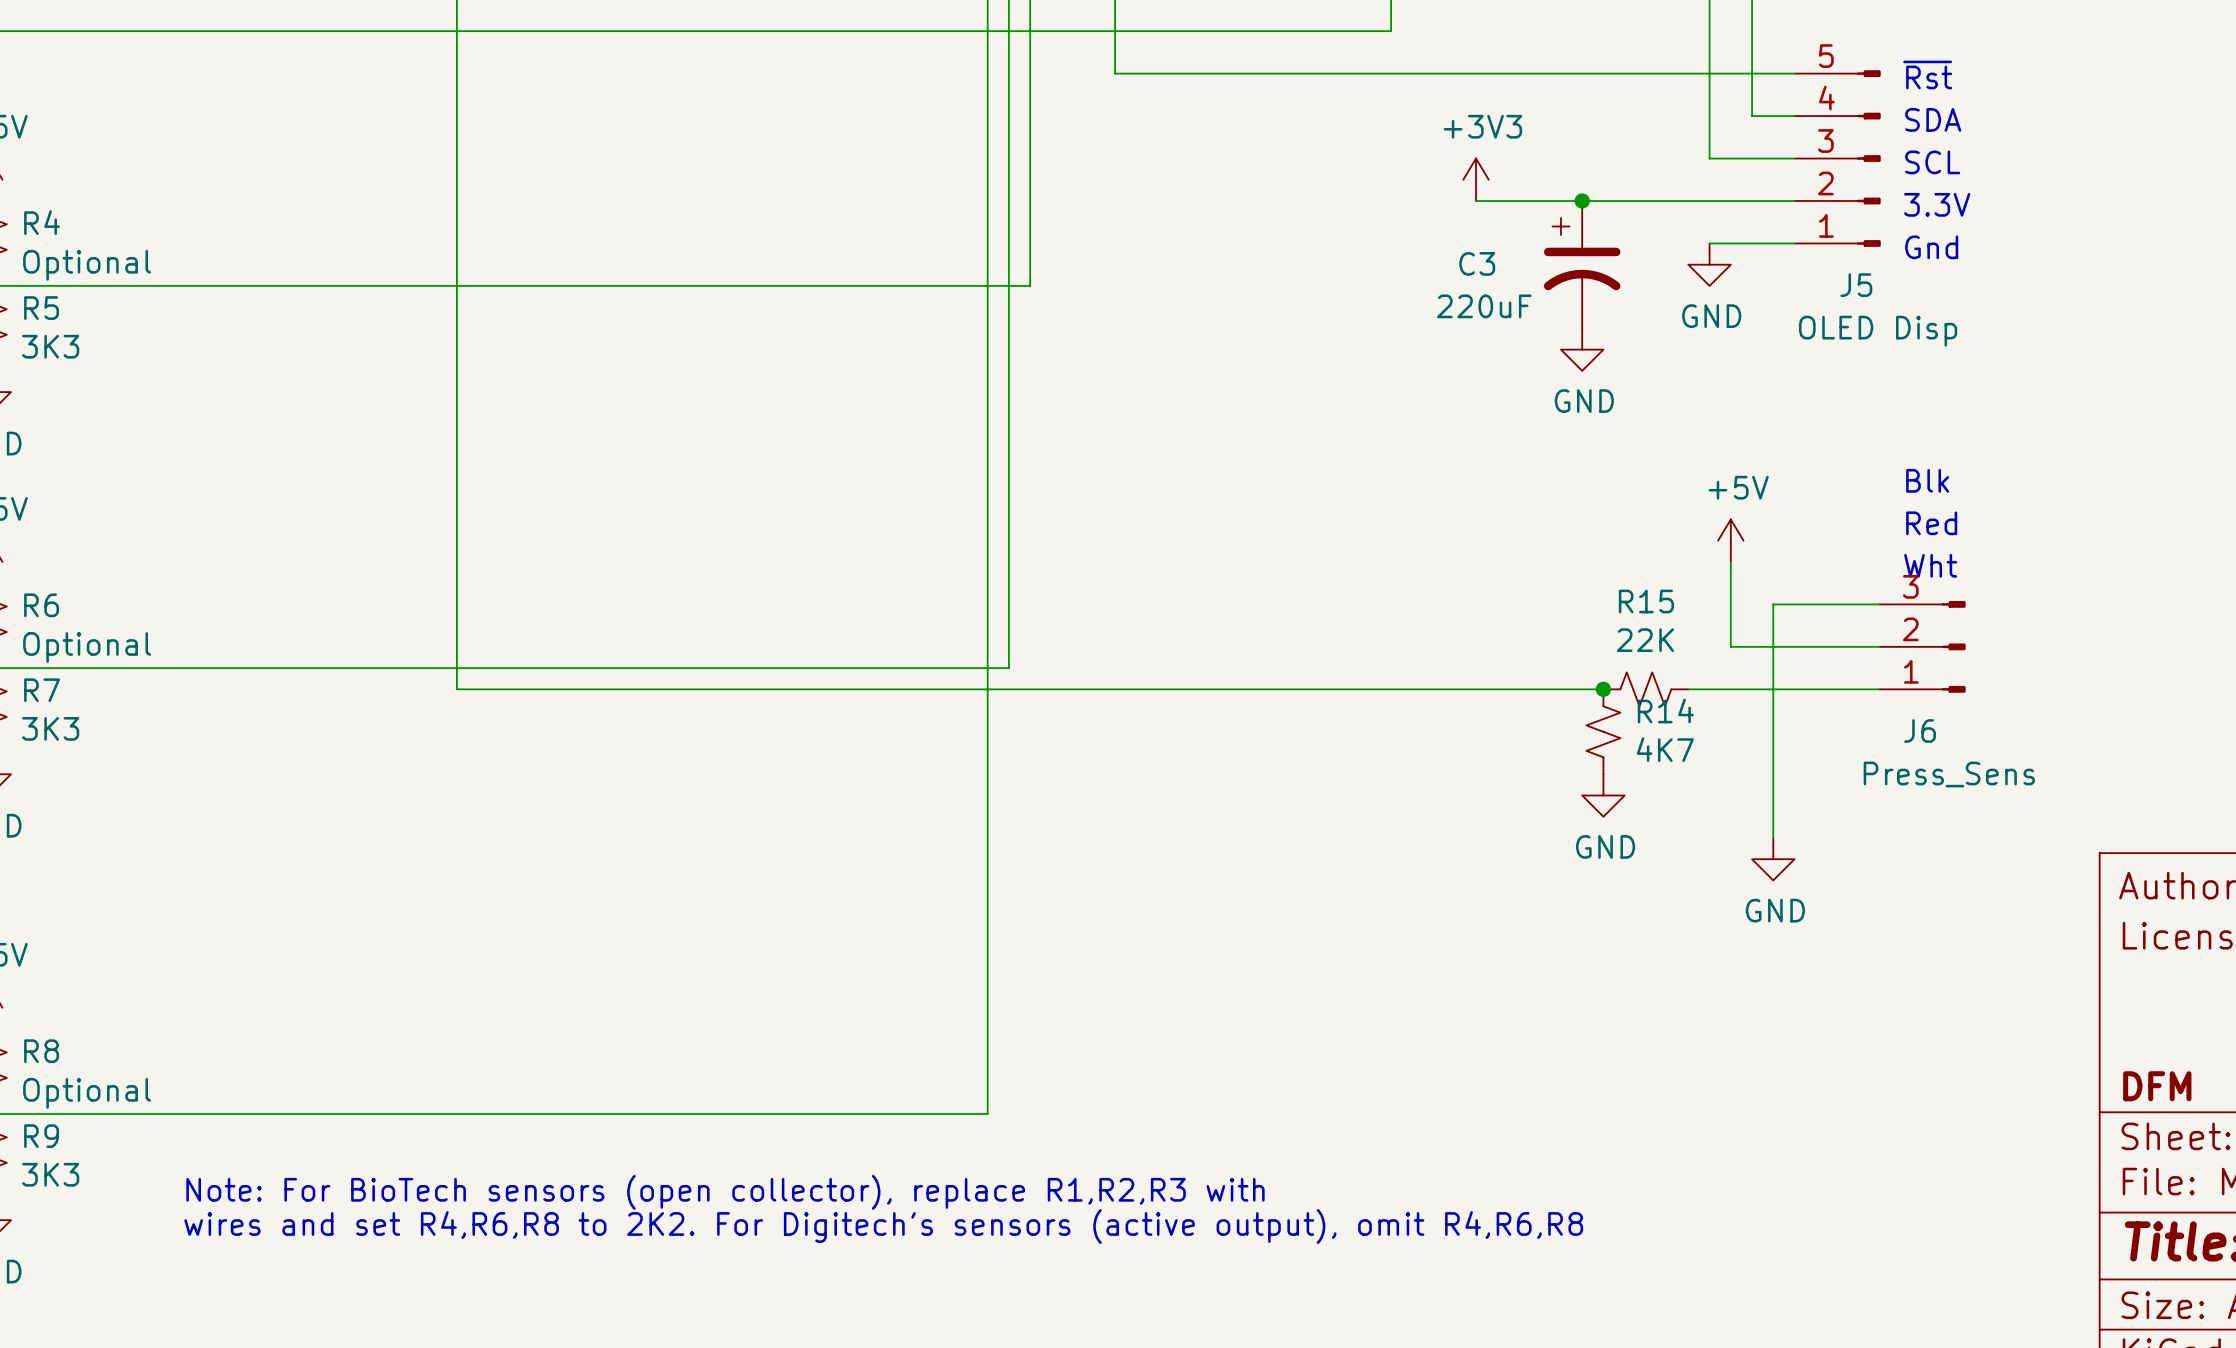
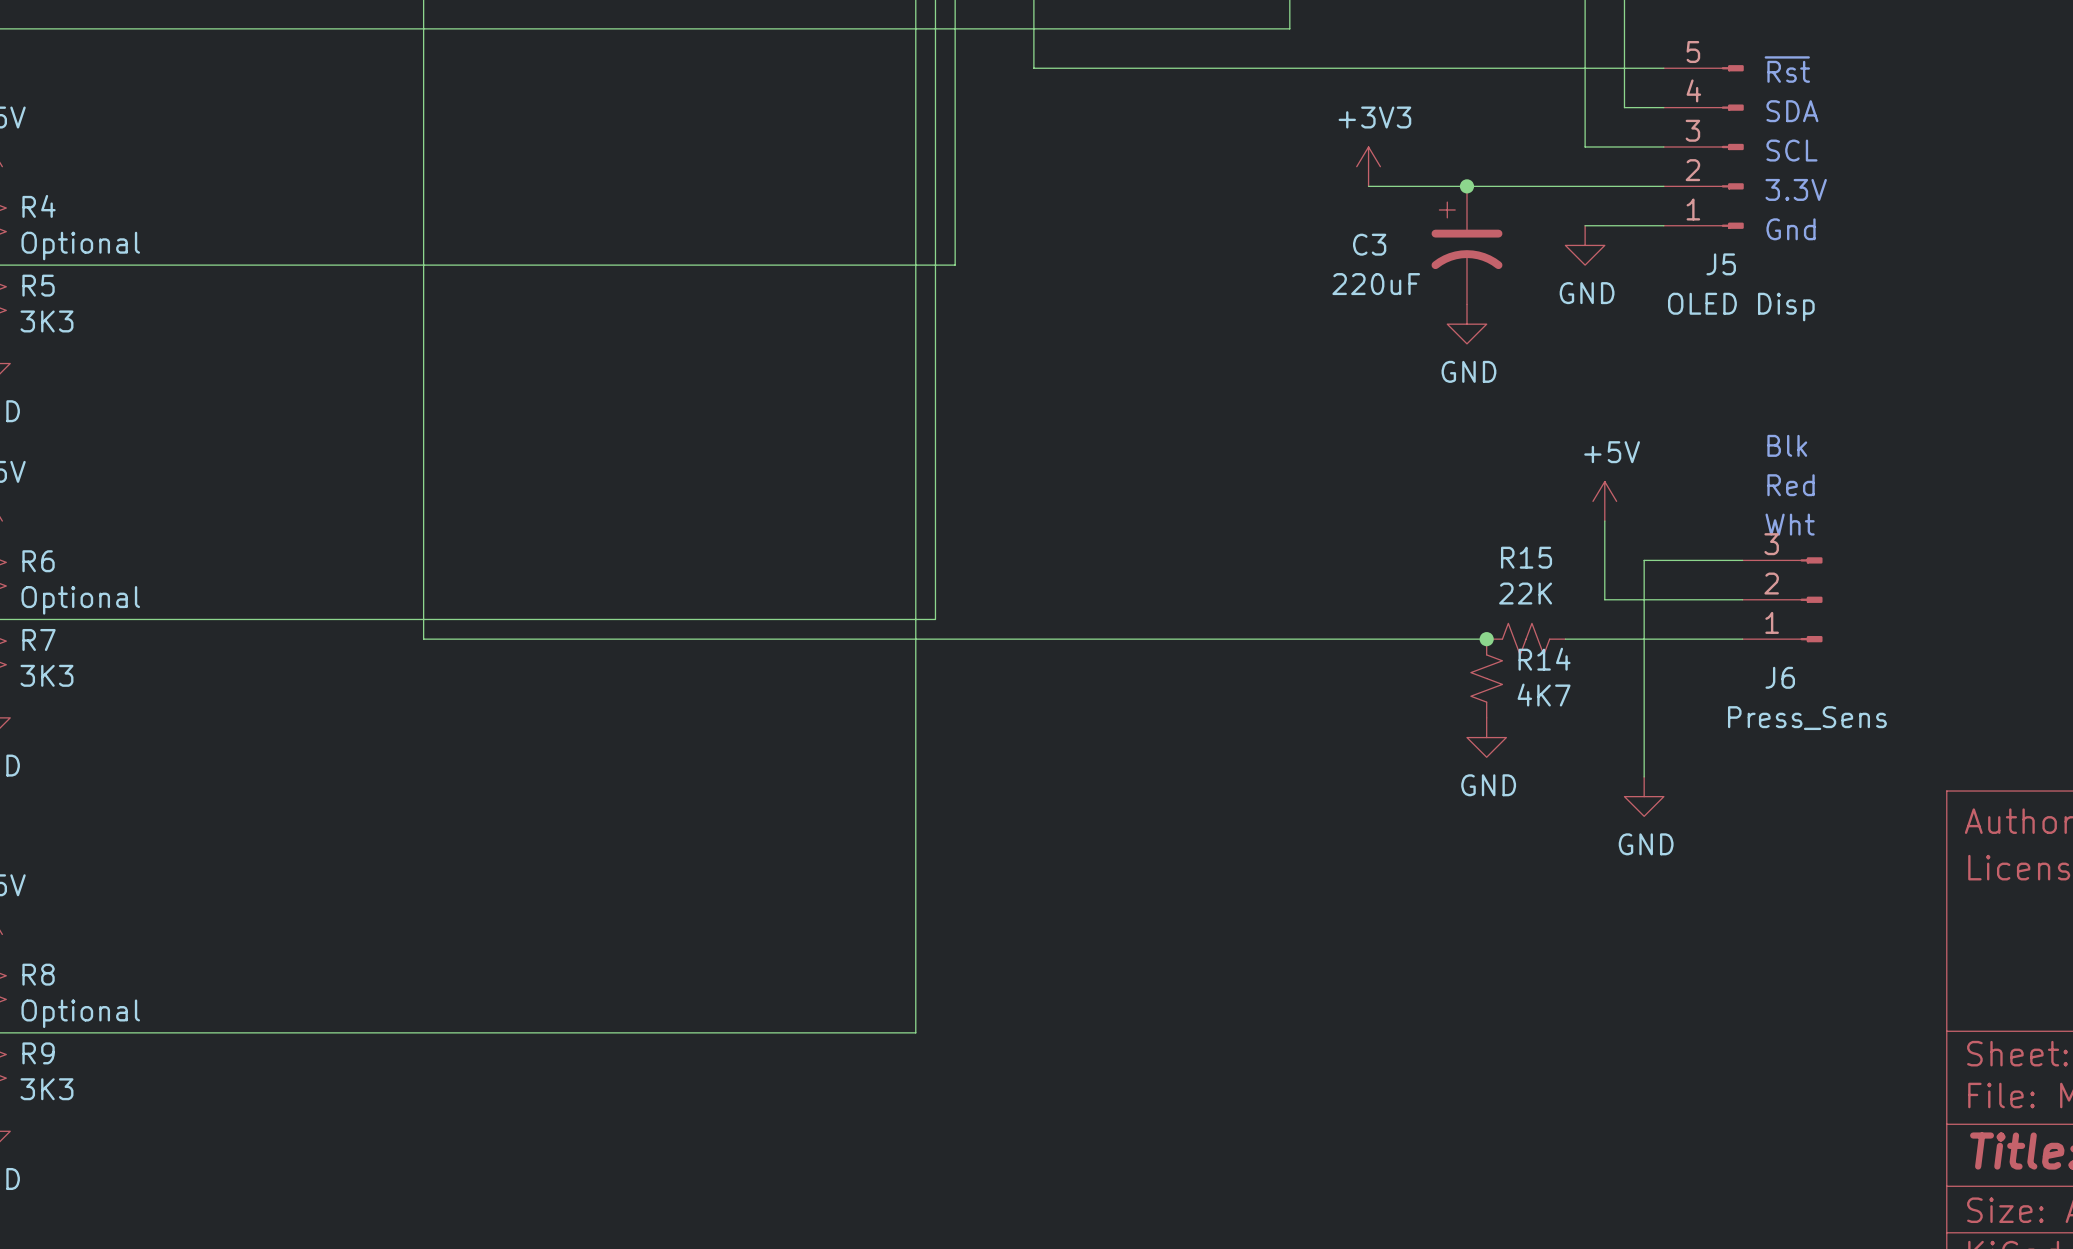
title block: DFM (2157, 1086) -> none
text: Note: For BioTech sensors (open collector), replace R1,R2,R3 with (725, 1192) -> none
text: wires and set R4,R6,R8 to 2K2. For Digitech's sensors (active output), omit R4,R6,R8 (883, 1226) -> none

